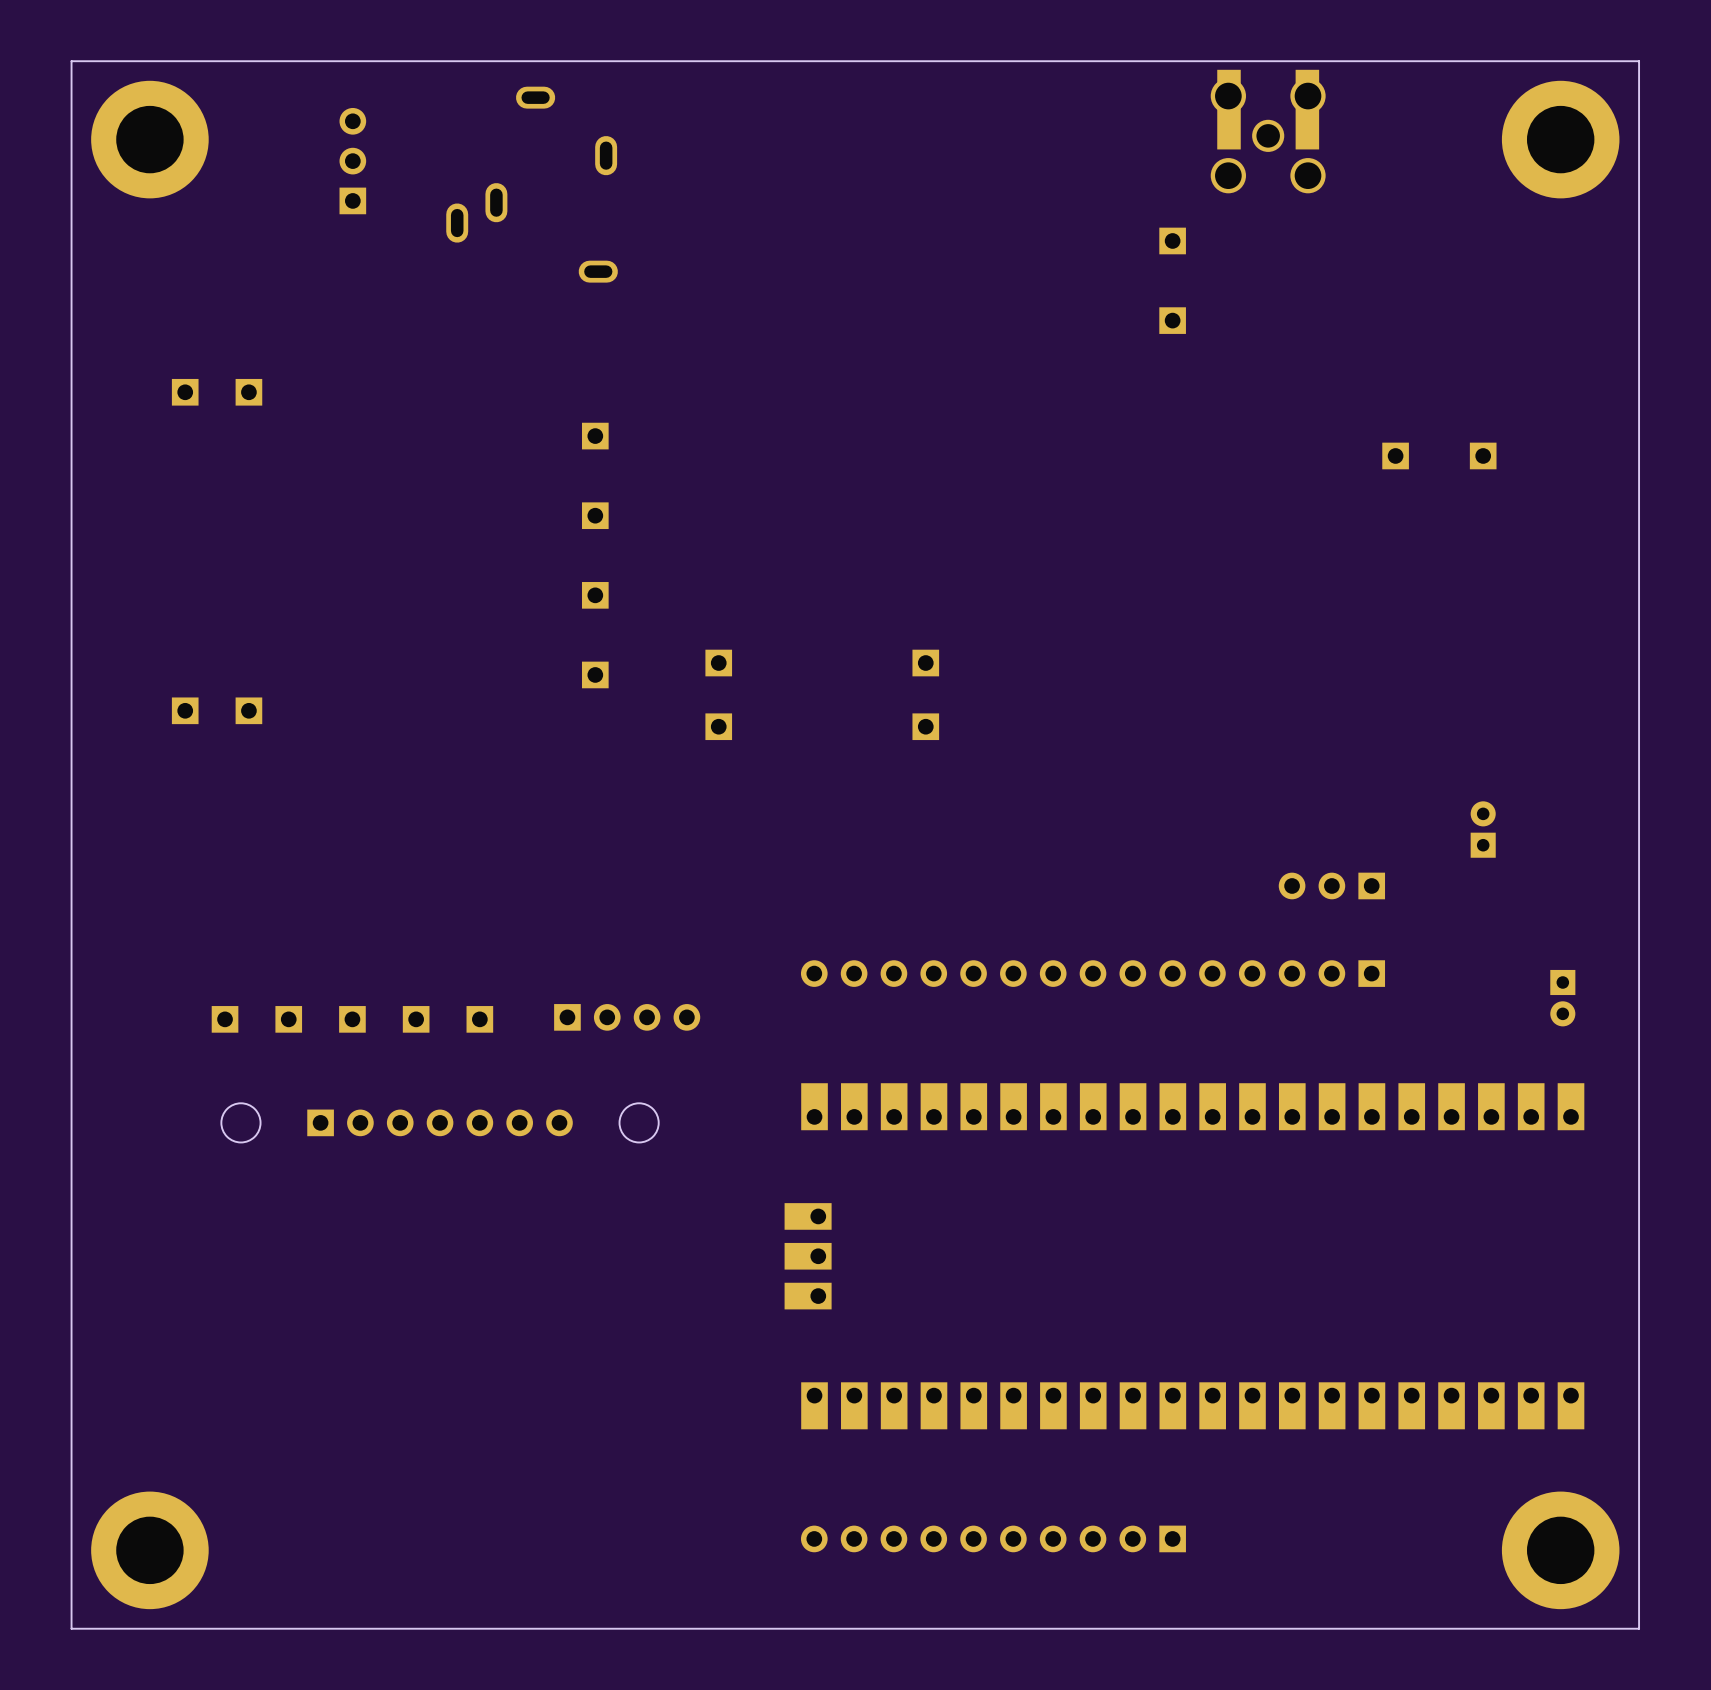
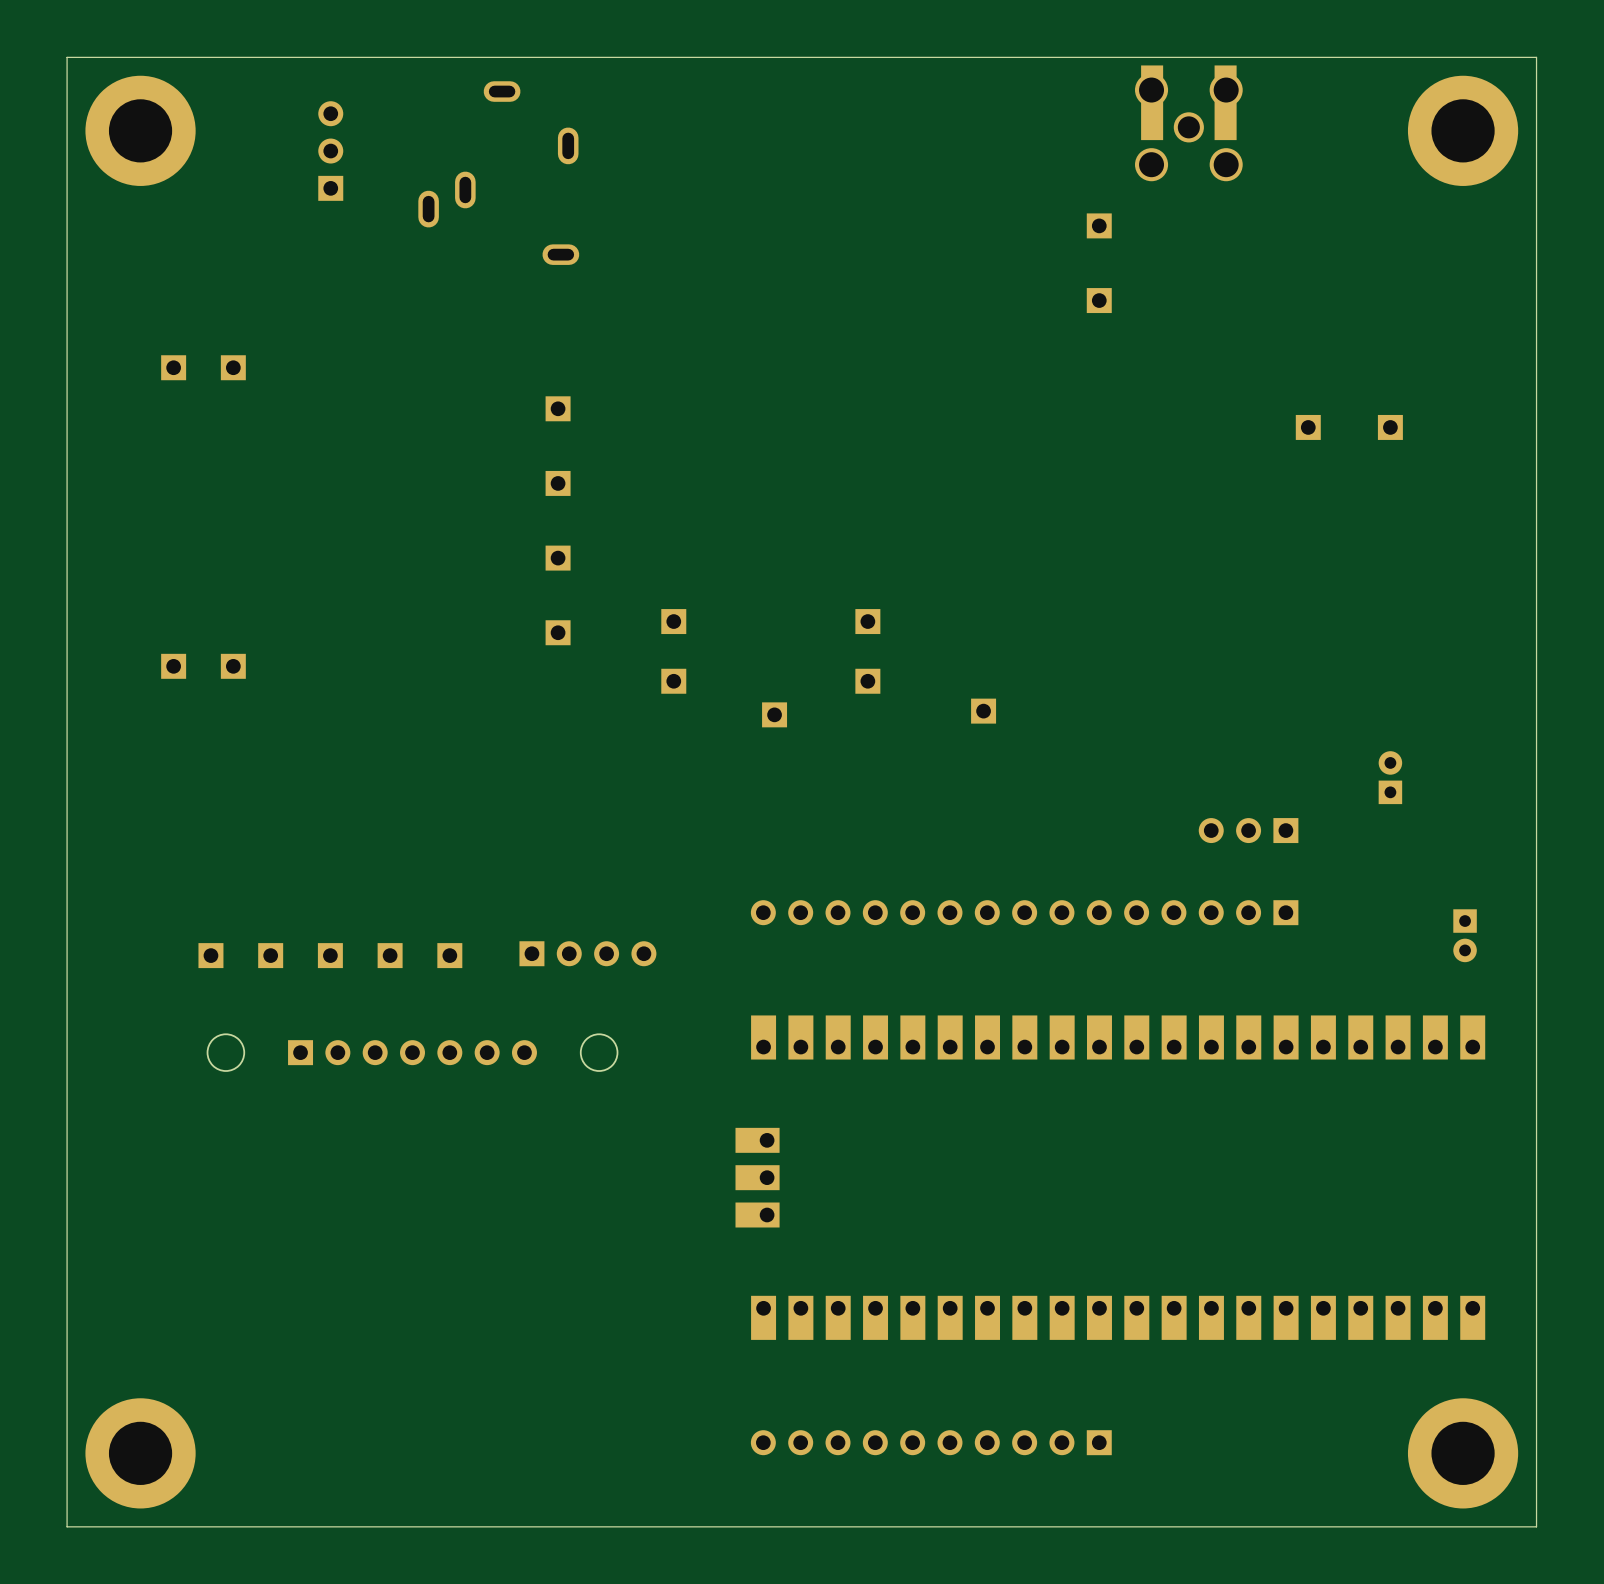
part: none -> (983, 711)
part: none -> (774, 714)

